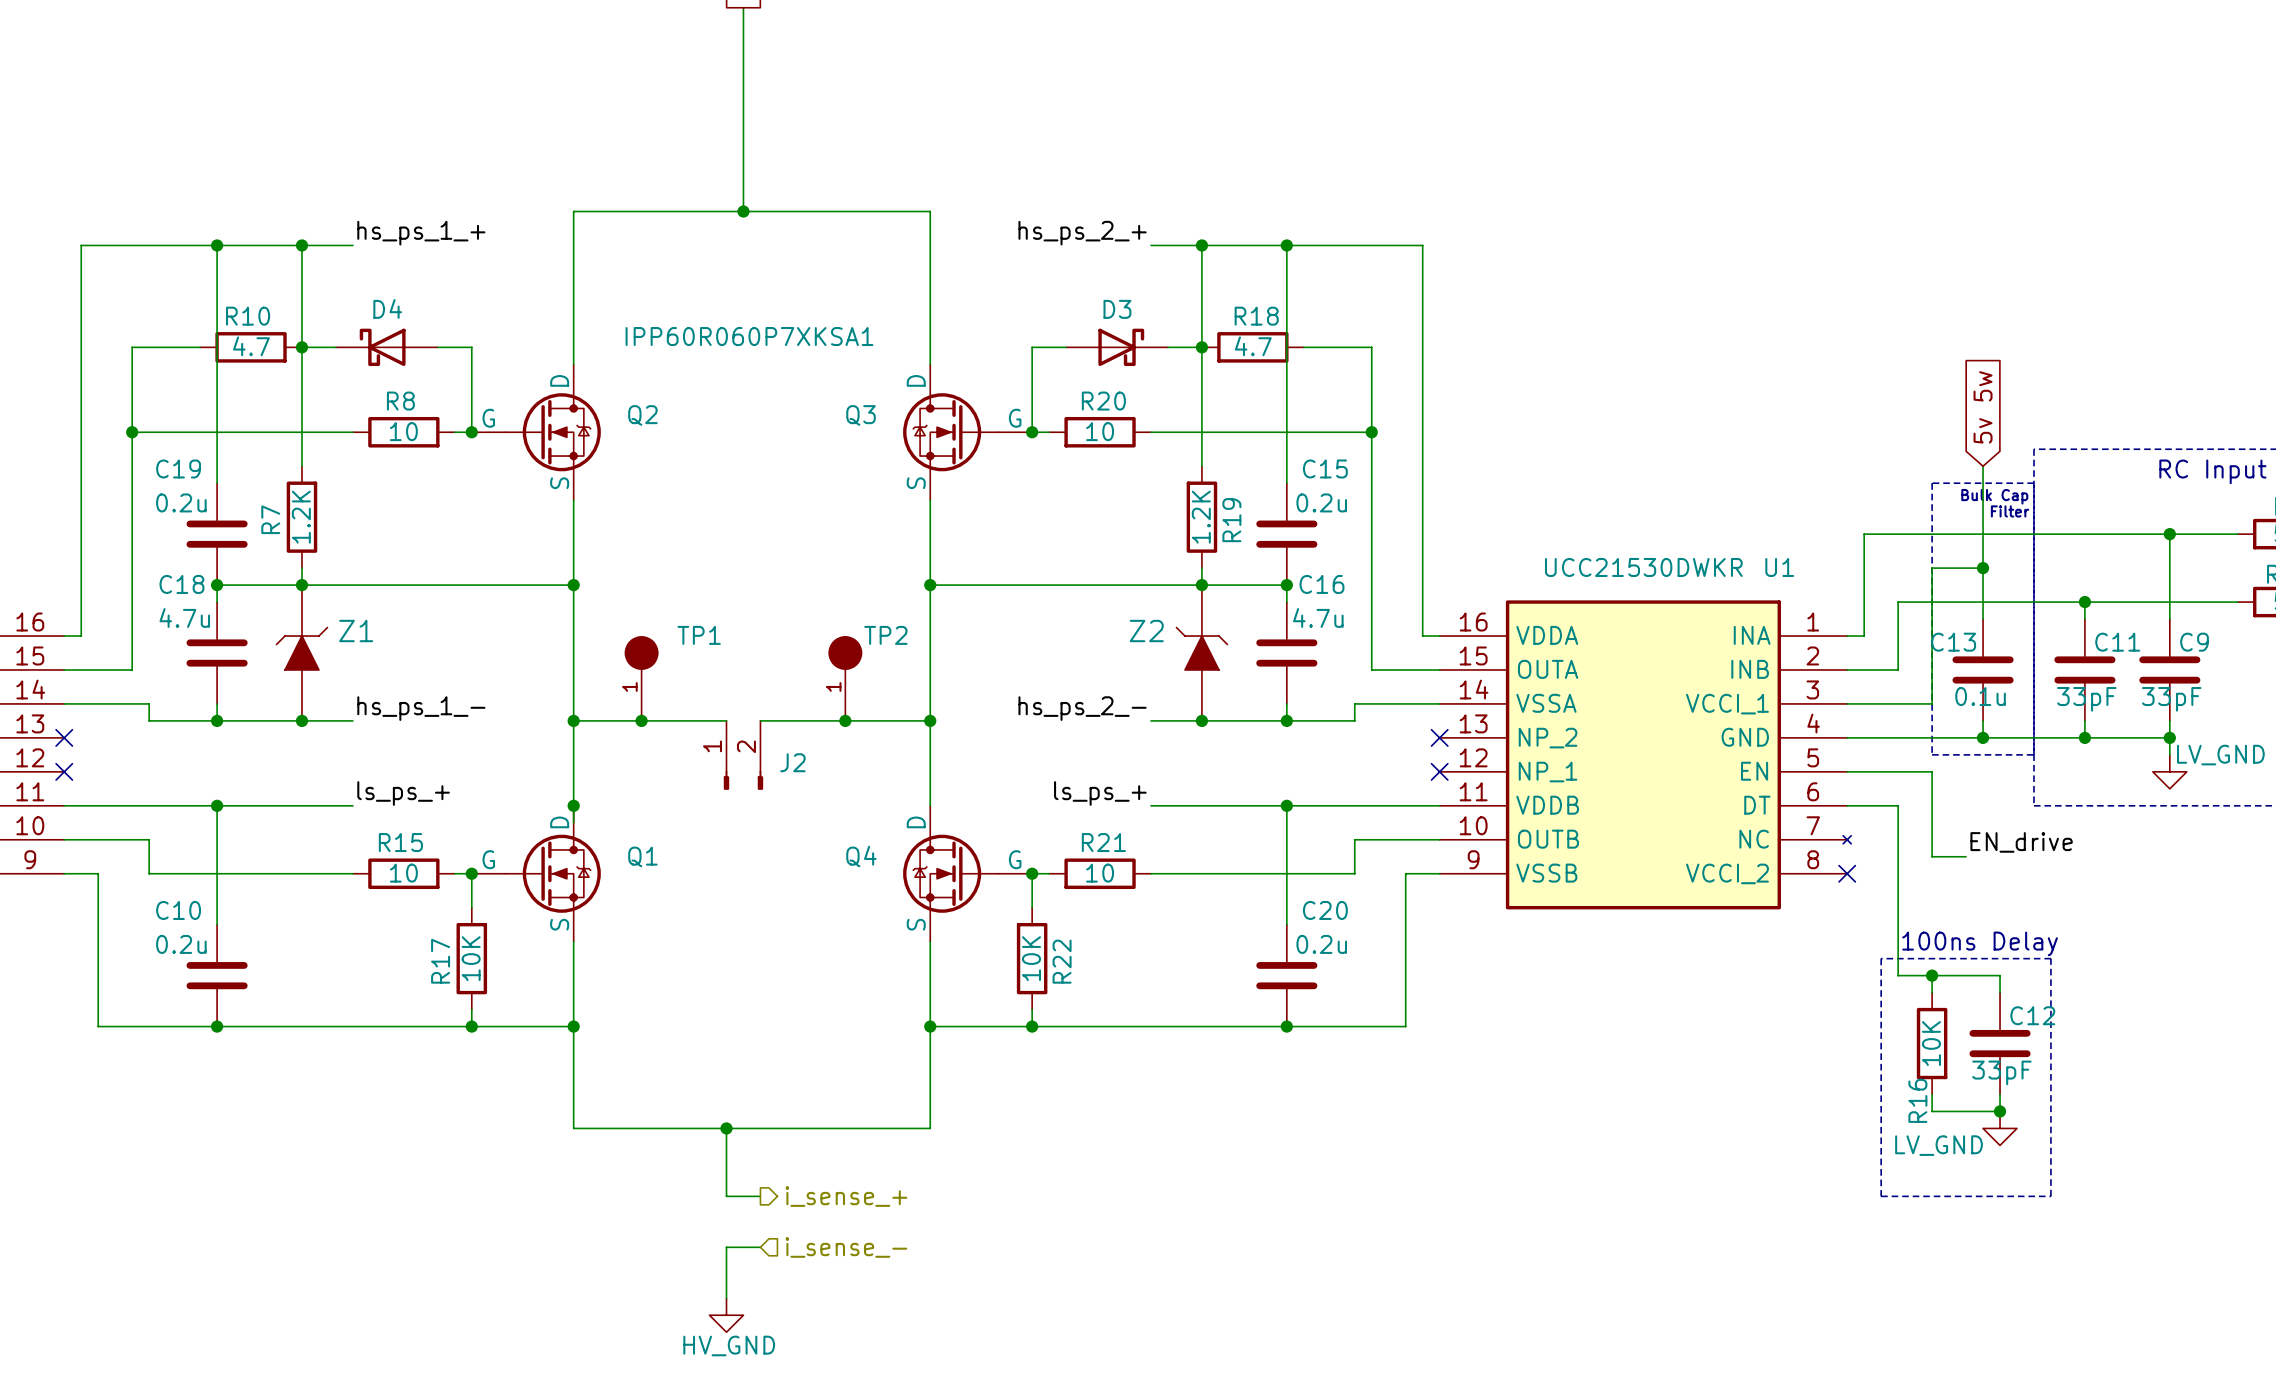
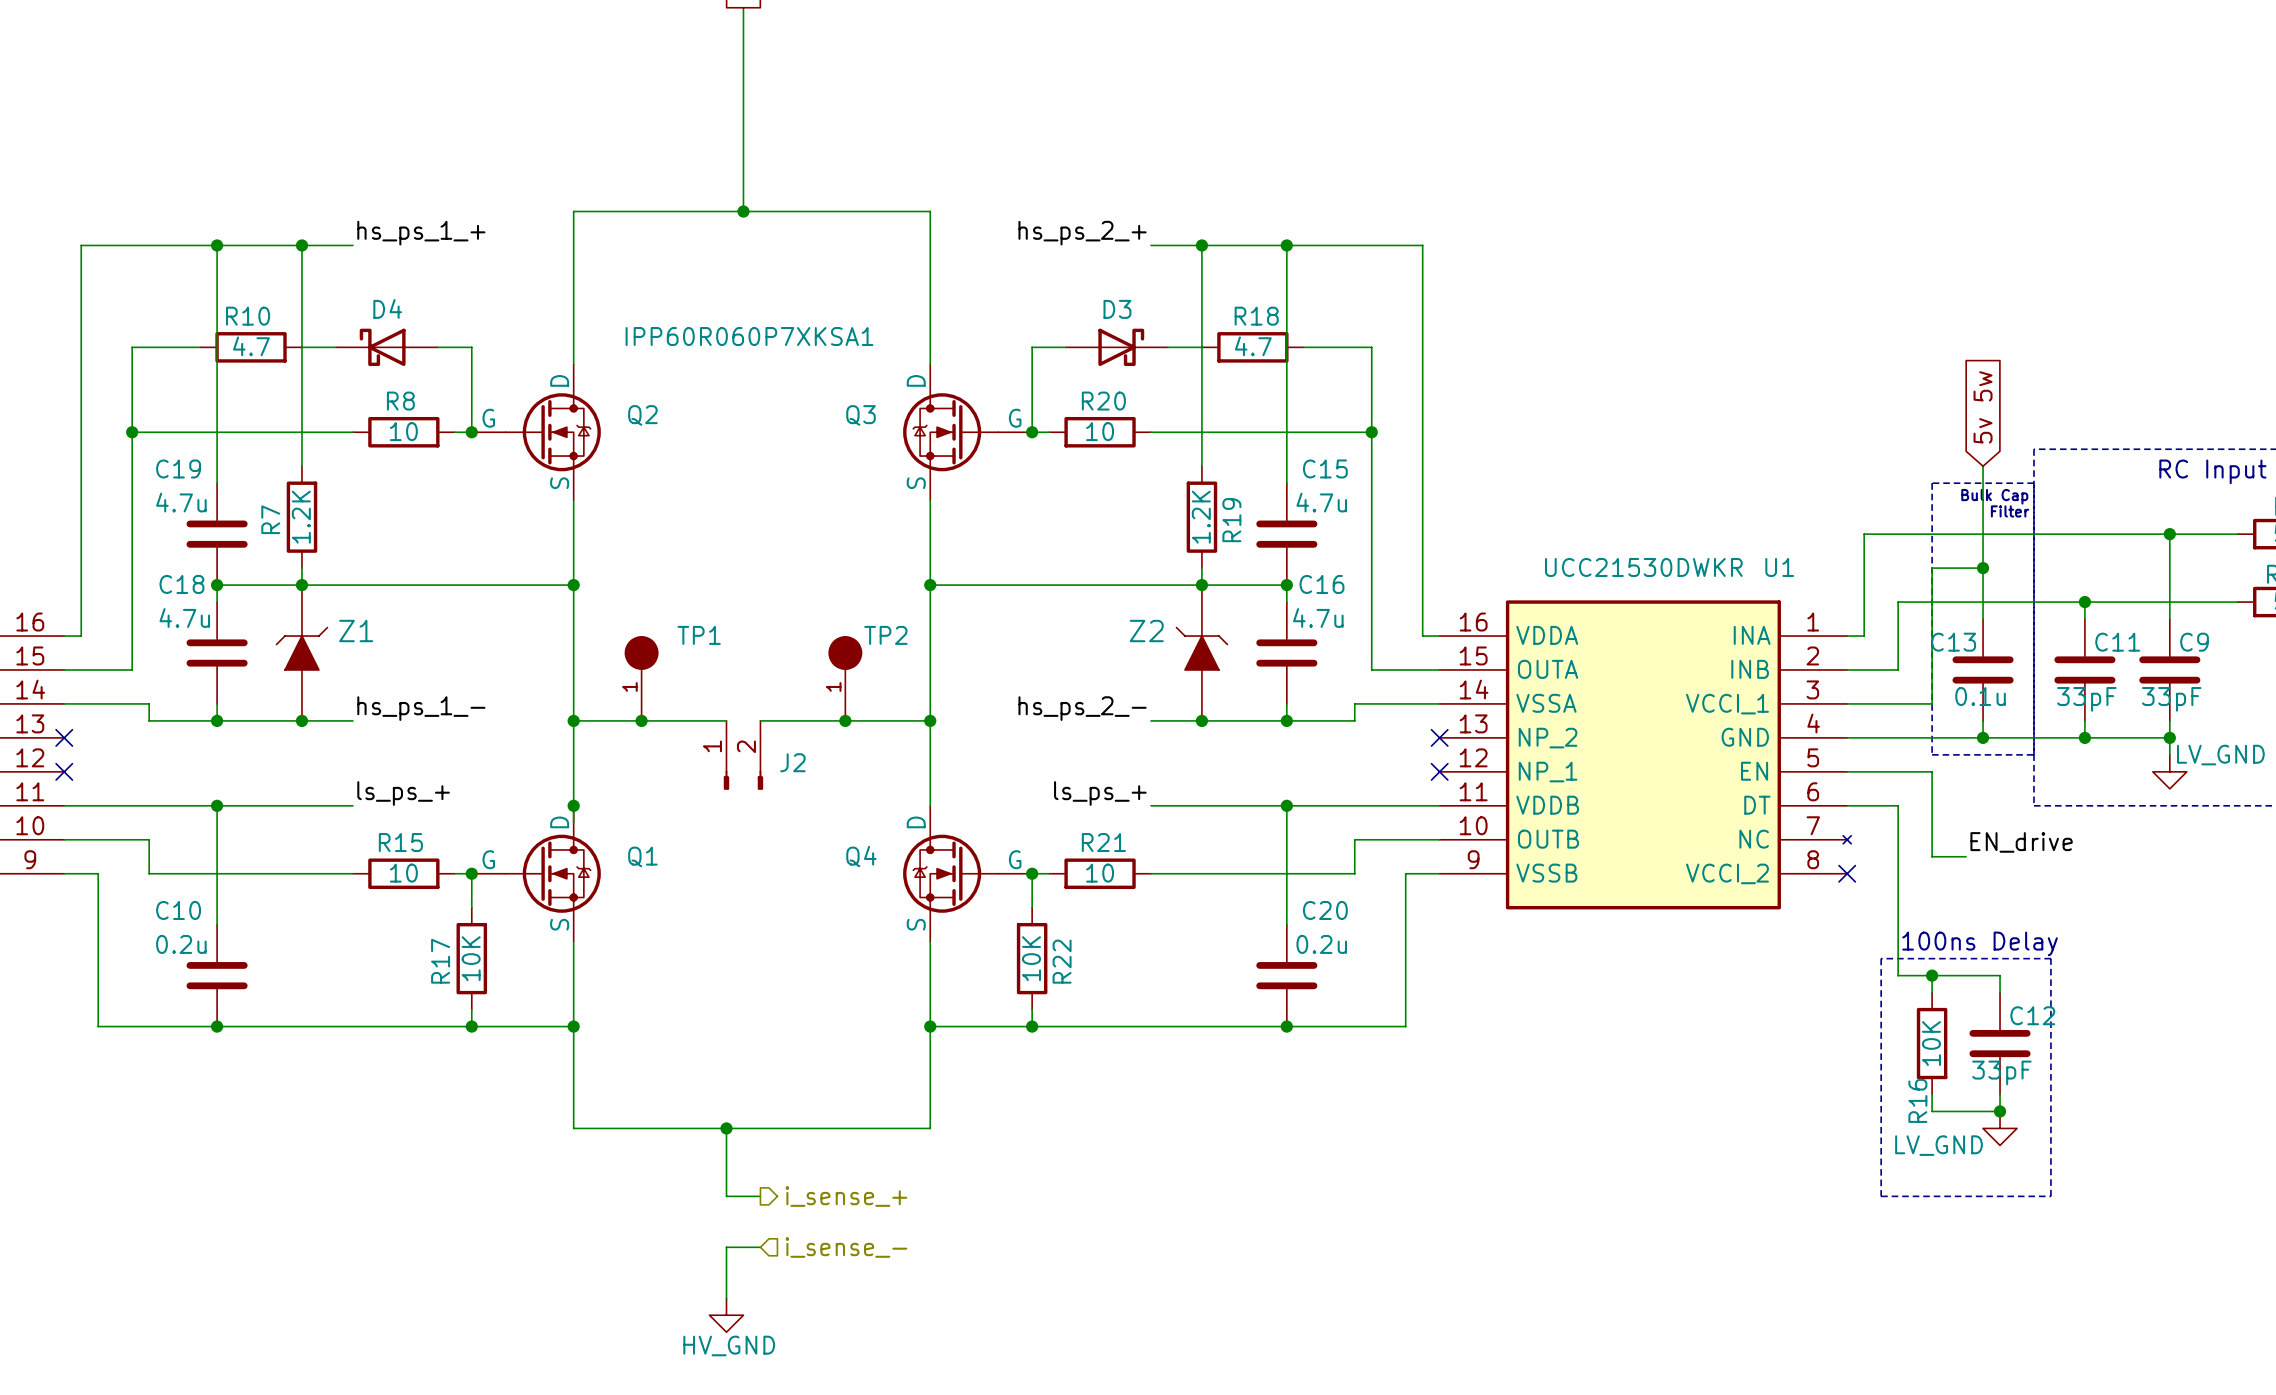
junction: (301, 347) -> none
junction: (1201, 347) -> none
C19 value: 0.2u (181, 502) -> 4.7u (181, 502)
C15 value: 0.2u (1321, 502) -> 4.7u (1321, 502)

